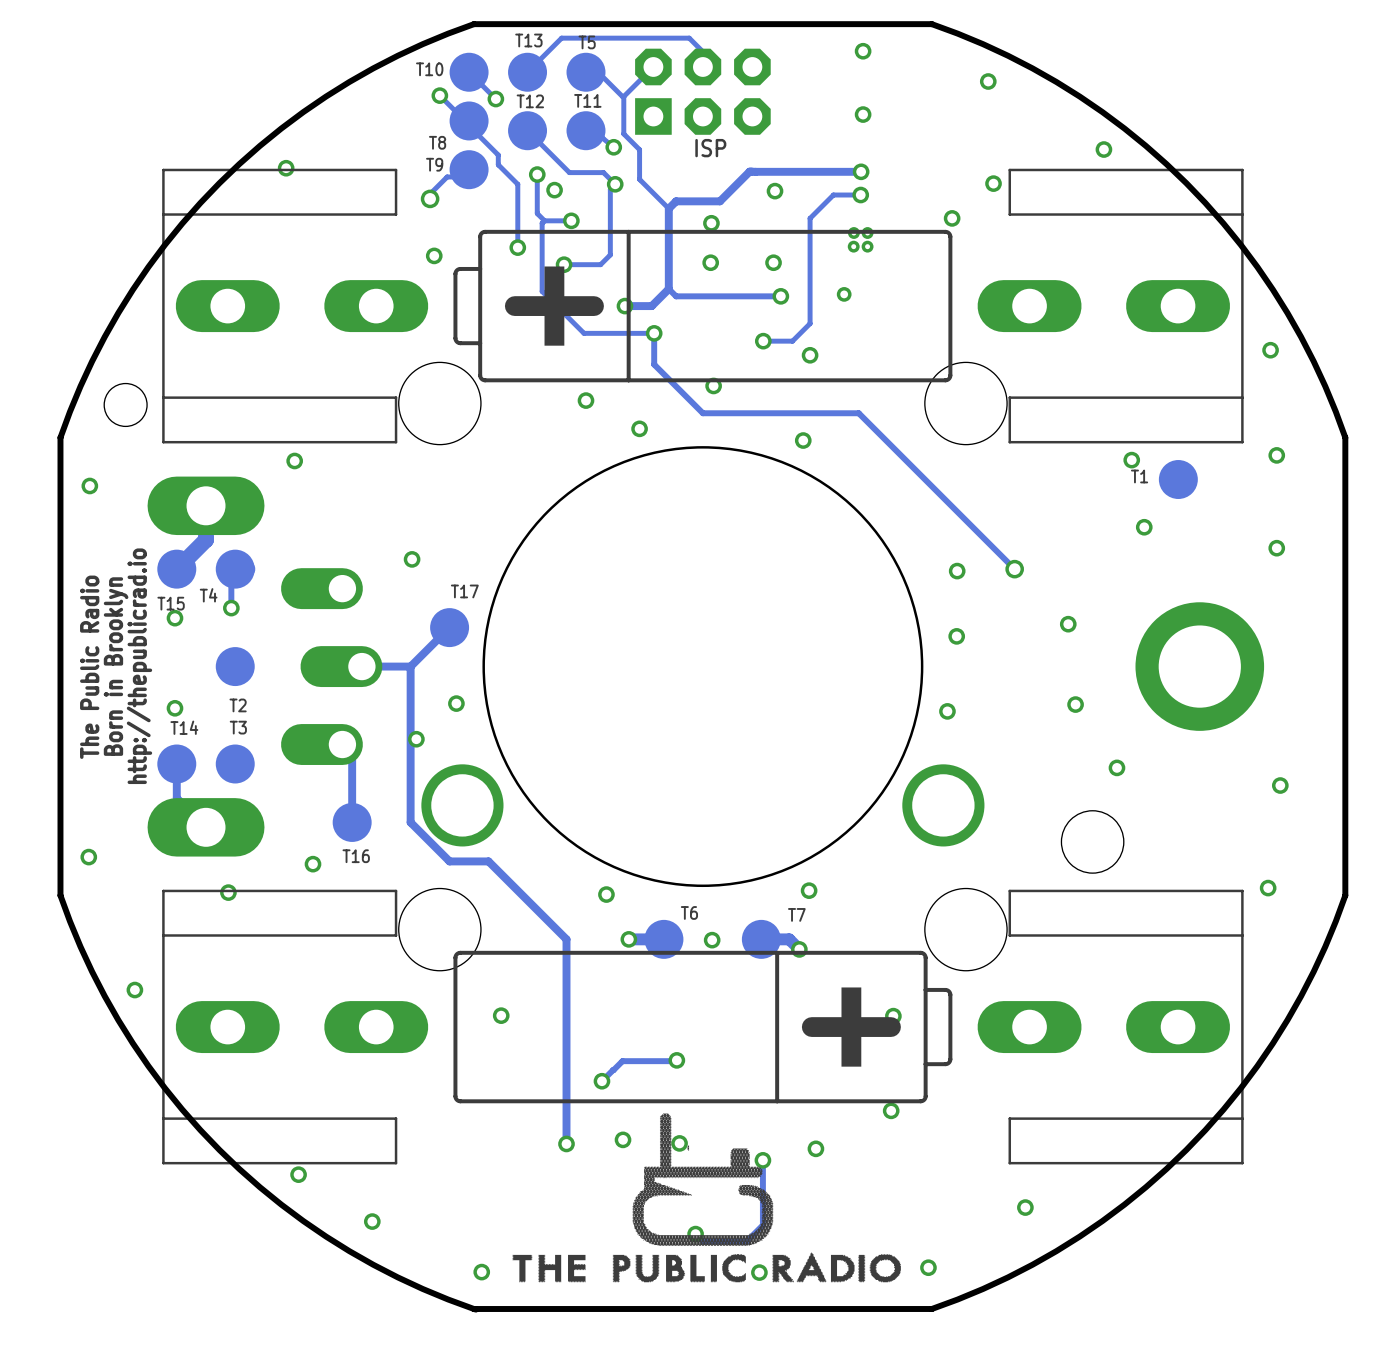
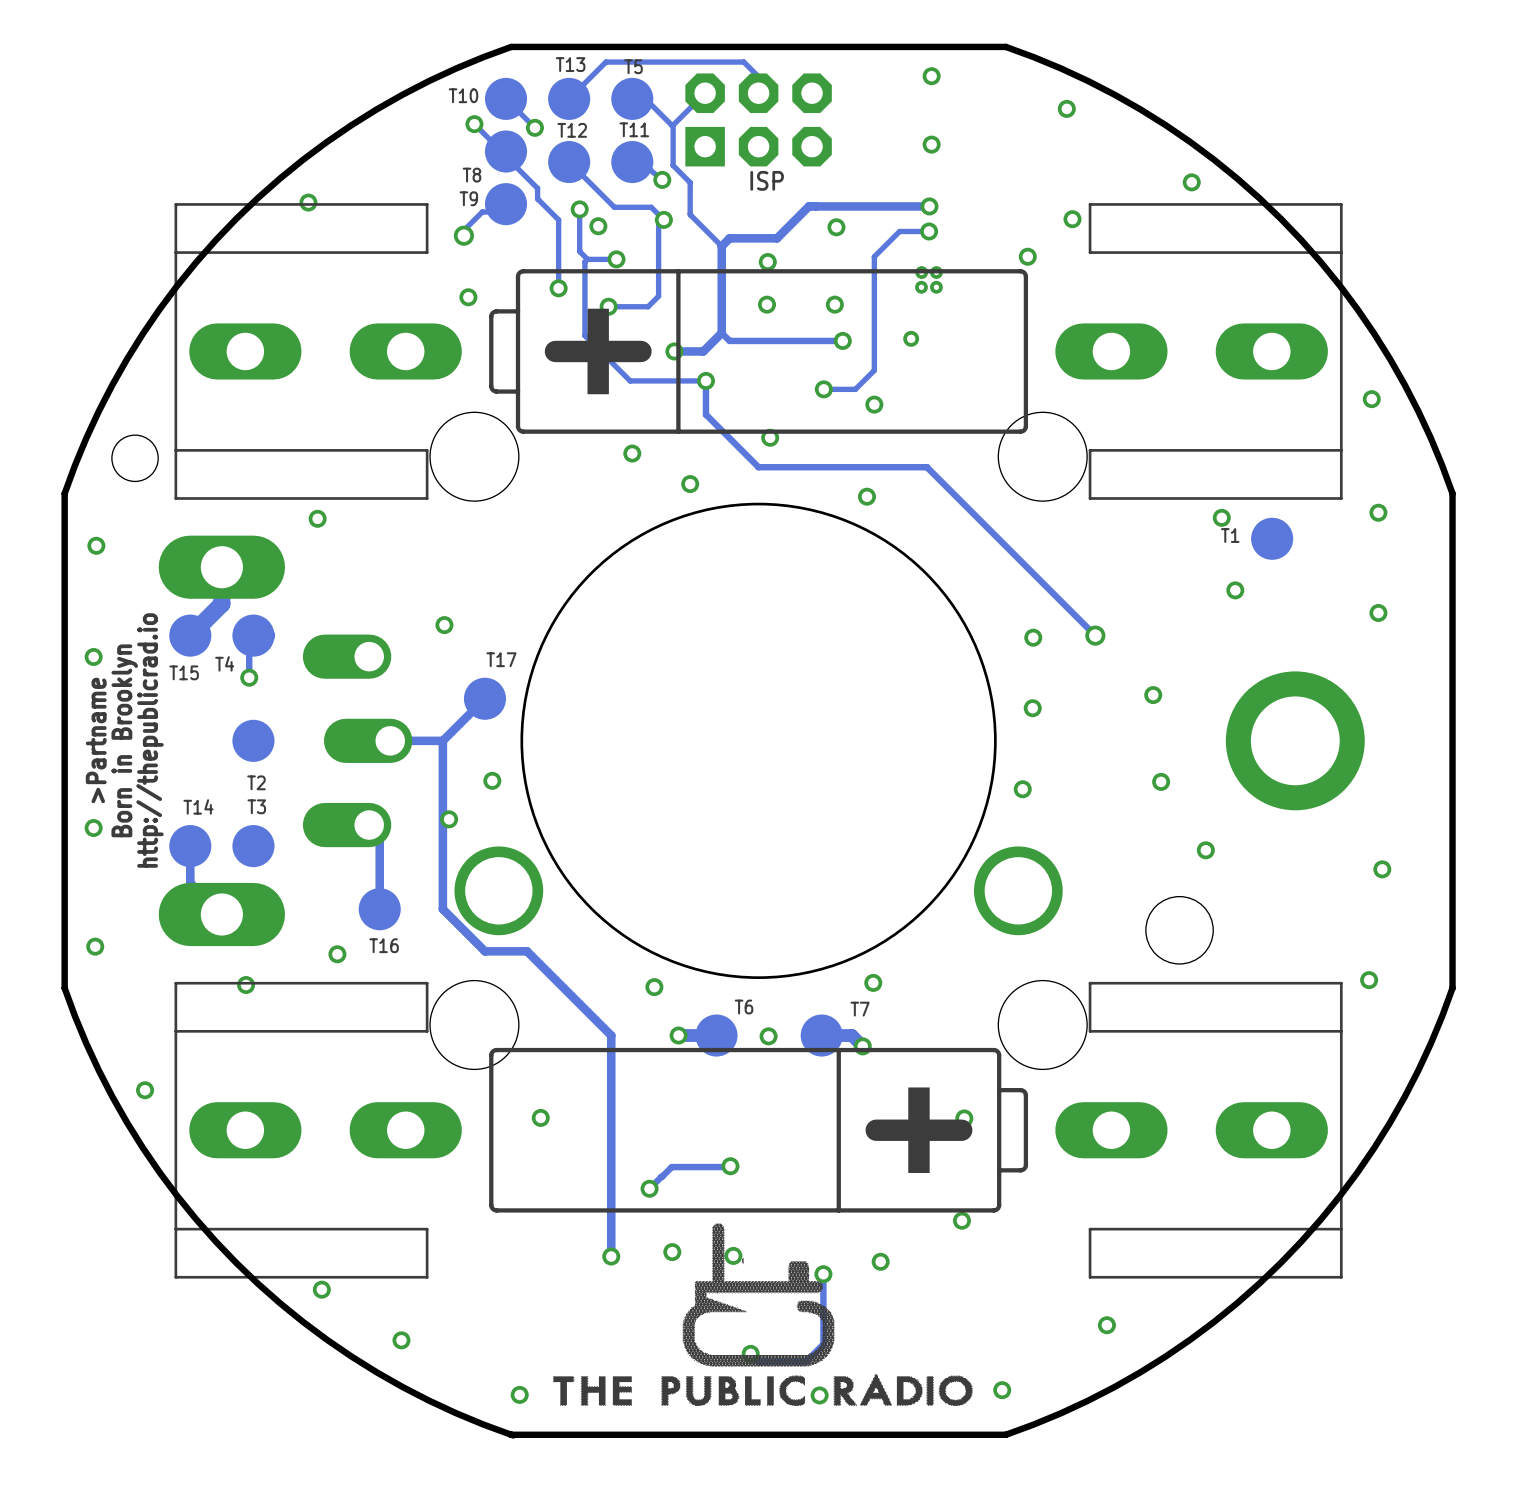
via: none -> (93, 657)
via: (174, 618) -> none
text: The Public Radio (89, 667) -> >Partname (96, 740)
via: (174, 708) -> none
via: none -> (93, 828)

